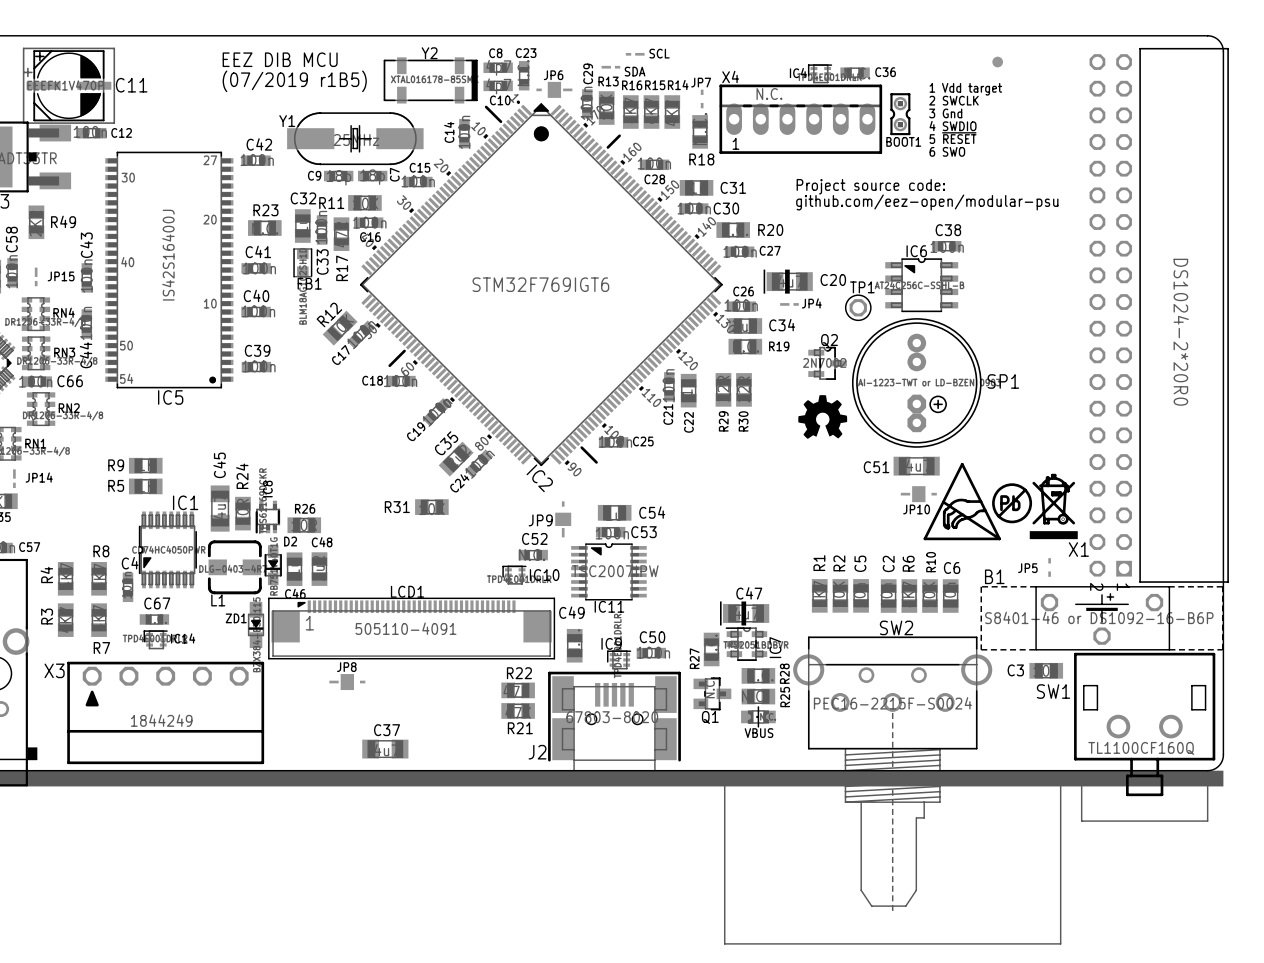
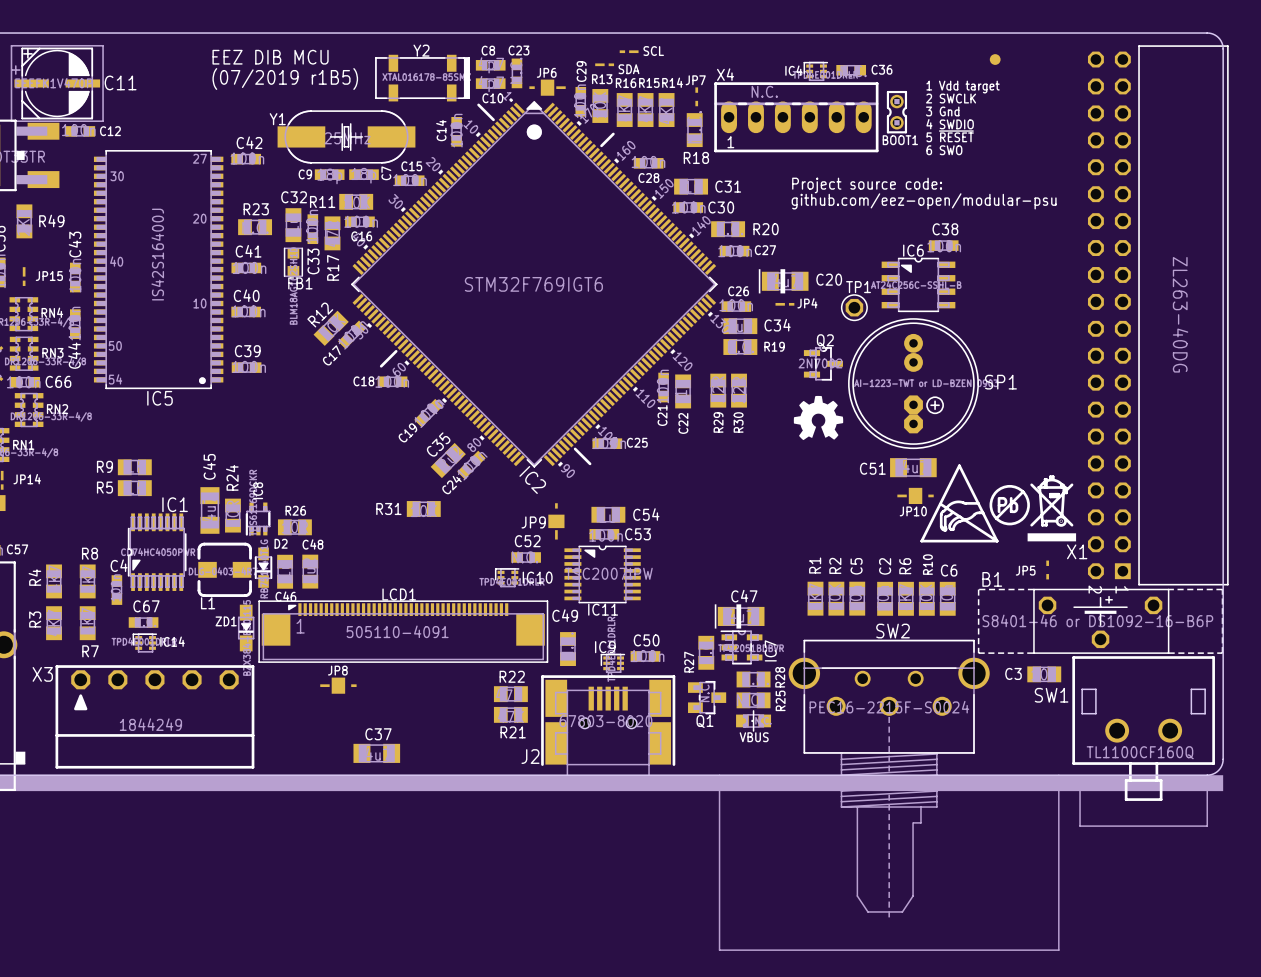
X1 value: DS1024-2*20R0 (1181, 332) -> ZL263-40DG (1180, 314)

